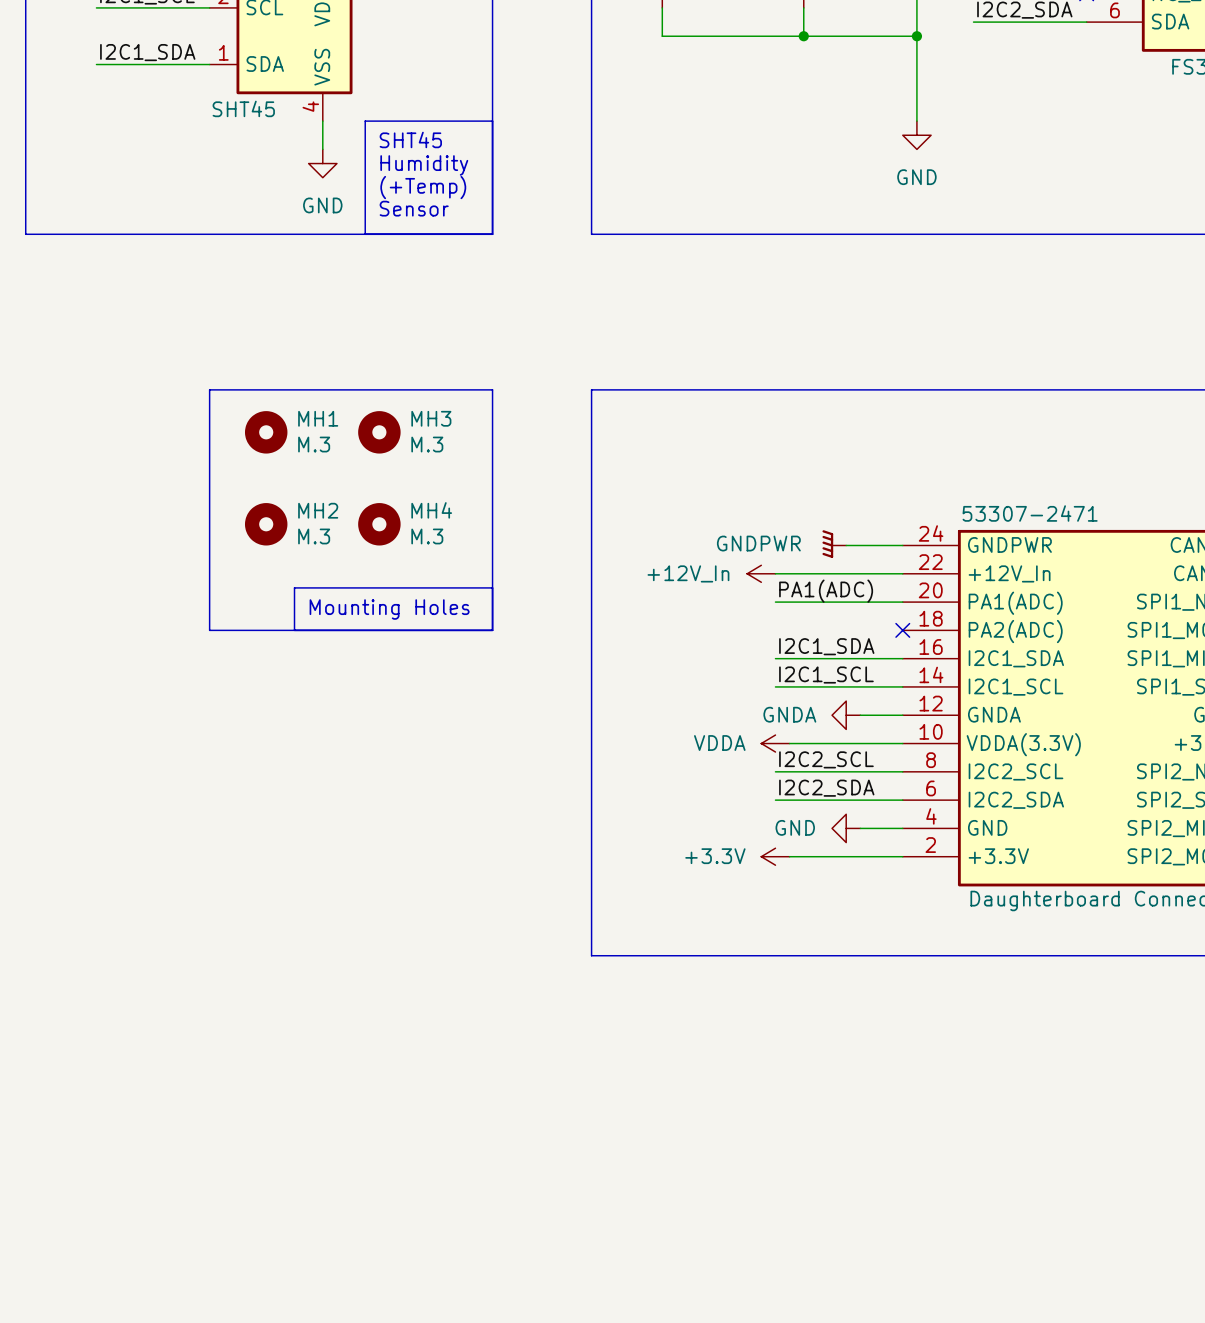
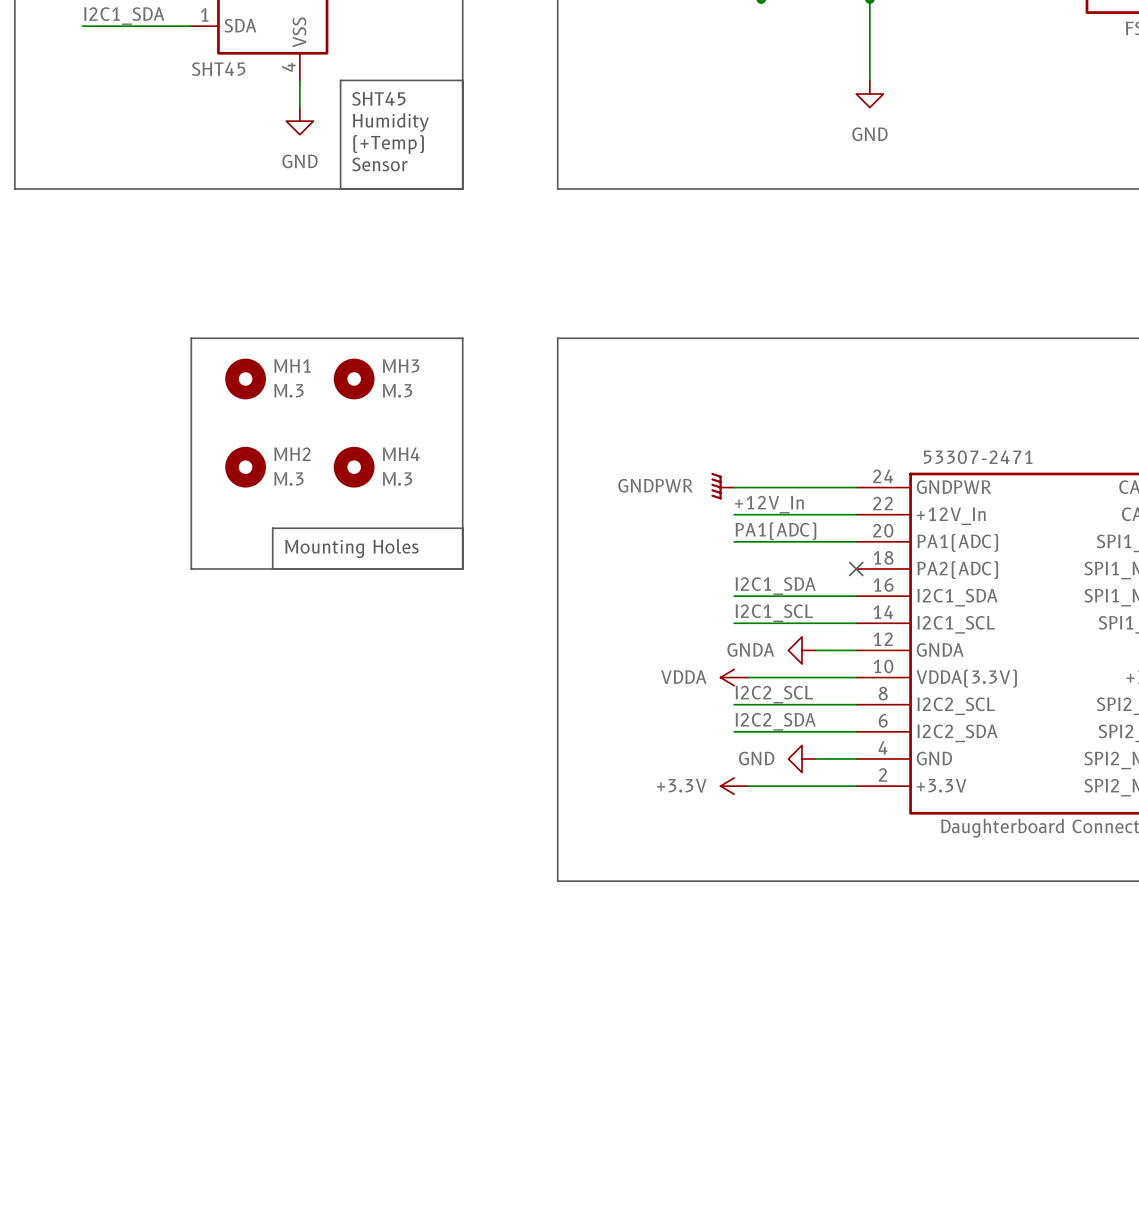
power symbol position: GNDPWR (834, 544) -> GNDPWR (722, 486)
wire: none -> (734, 487) (802, 487)
label: none -> +12V_In (769, 504)
power symbol: +12V_In (761, 573) -> none

